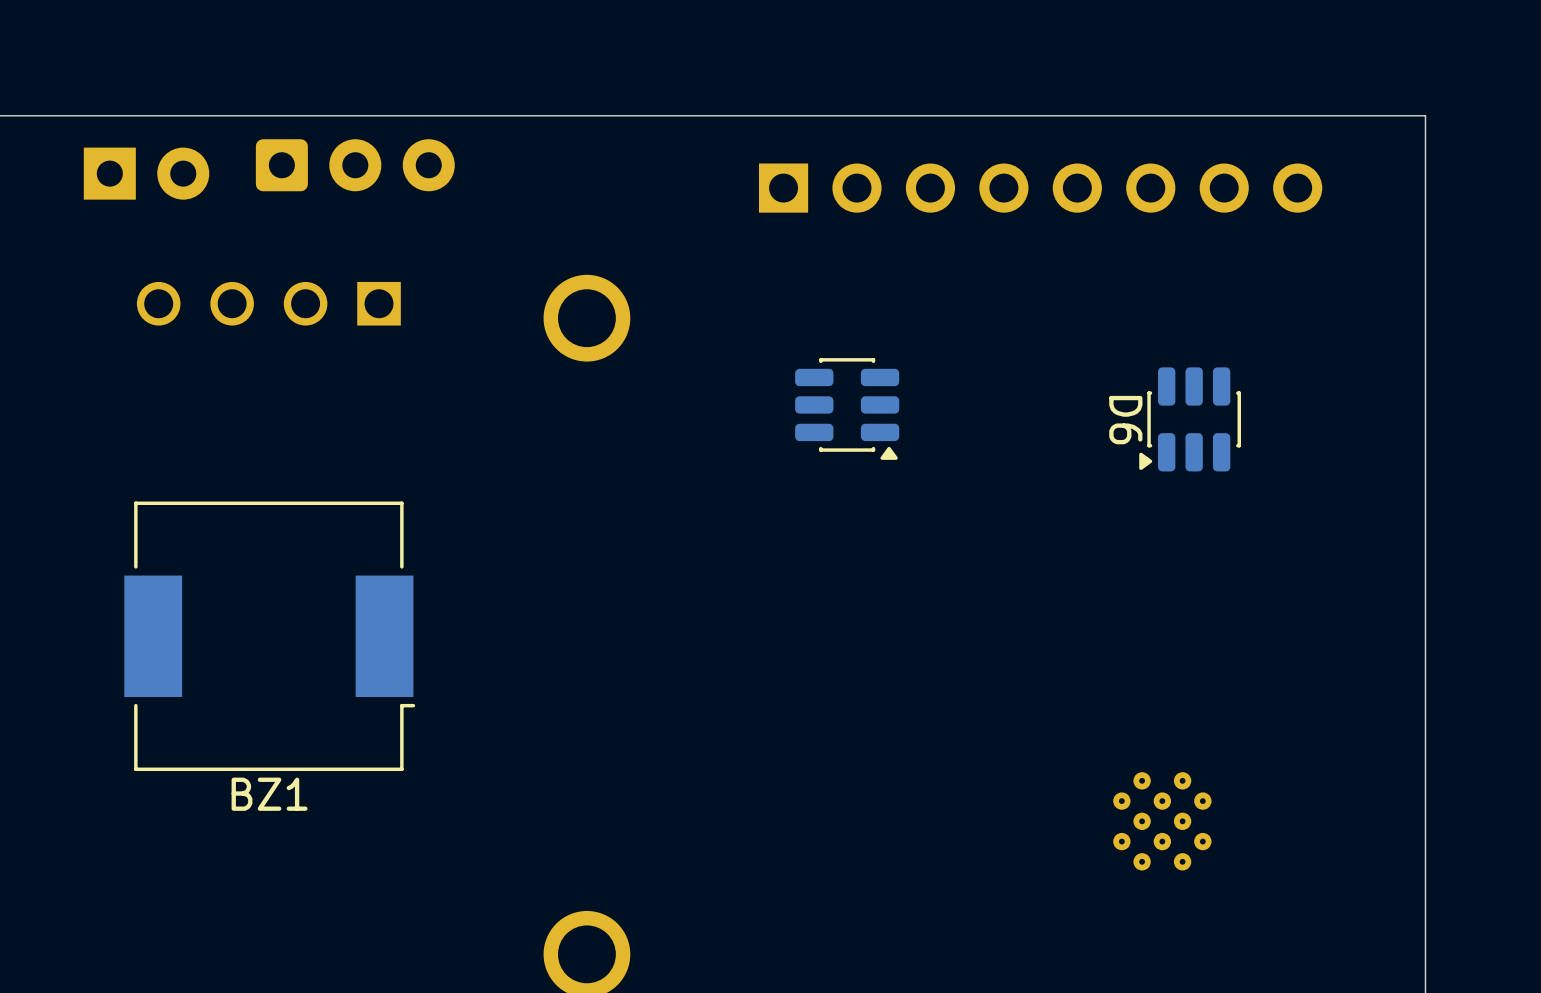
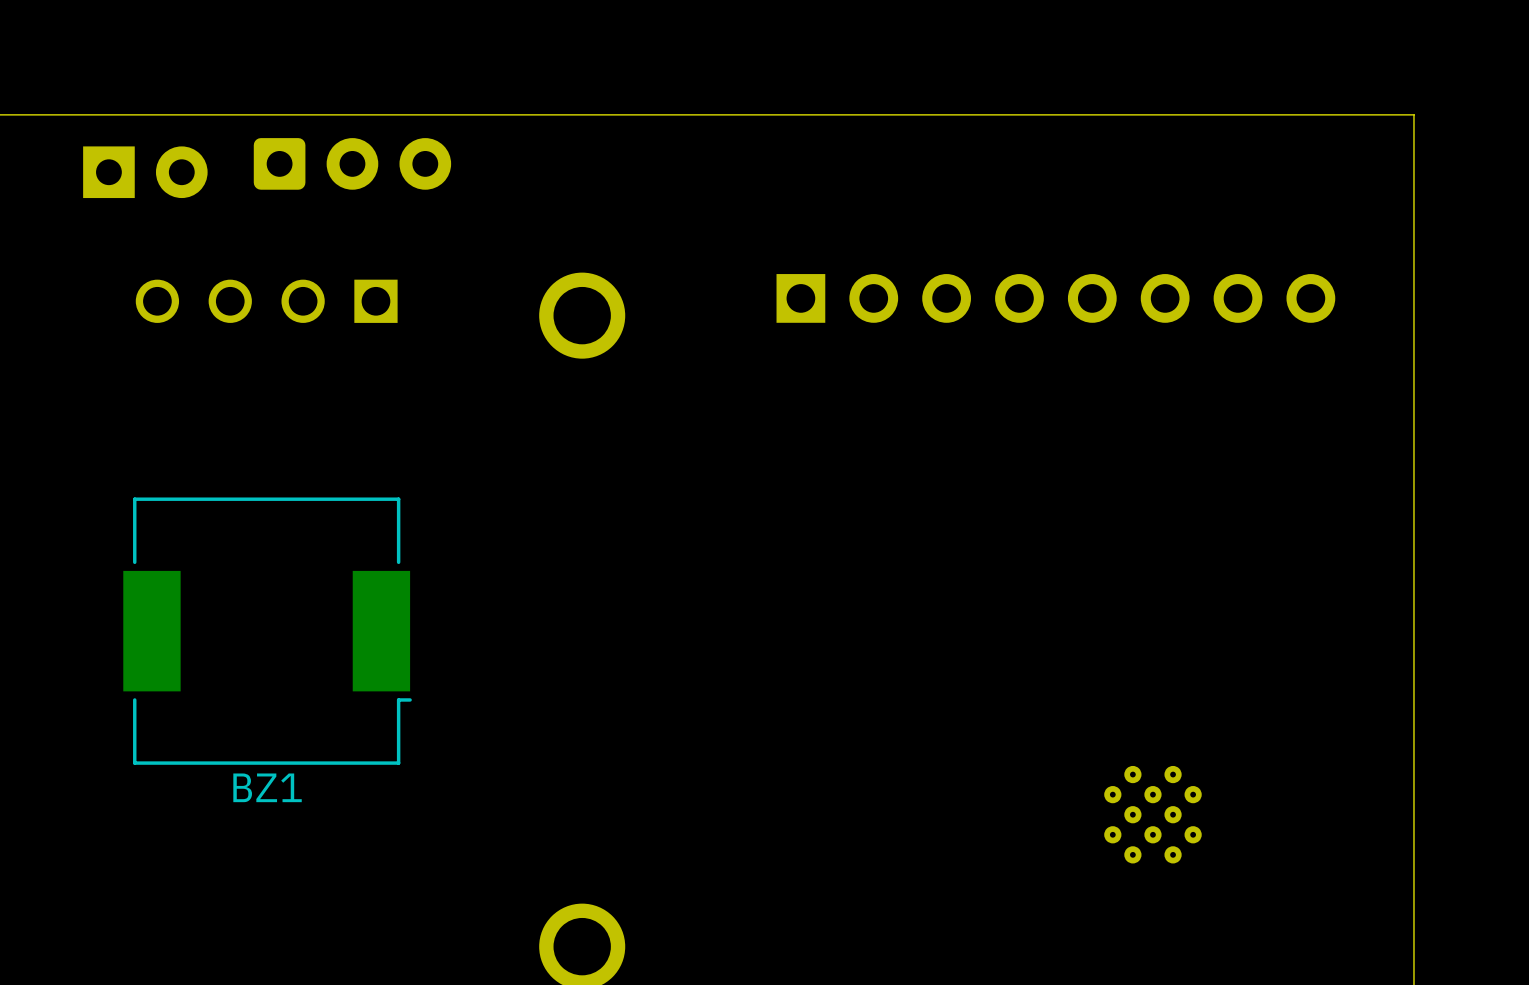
part position: (1040, 188) -> (1055, 298)
part: (847, 408) -> none
D6: (1190, 419) -> none

